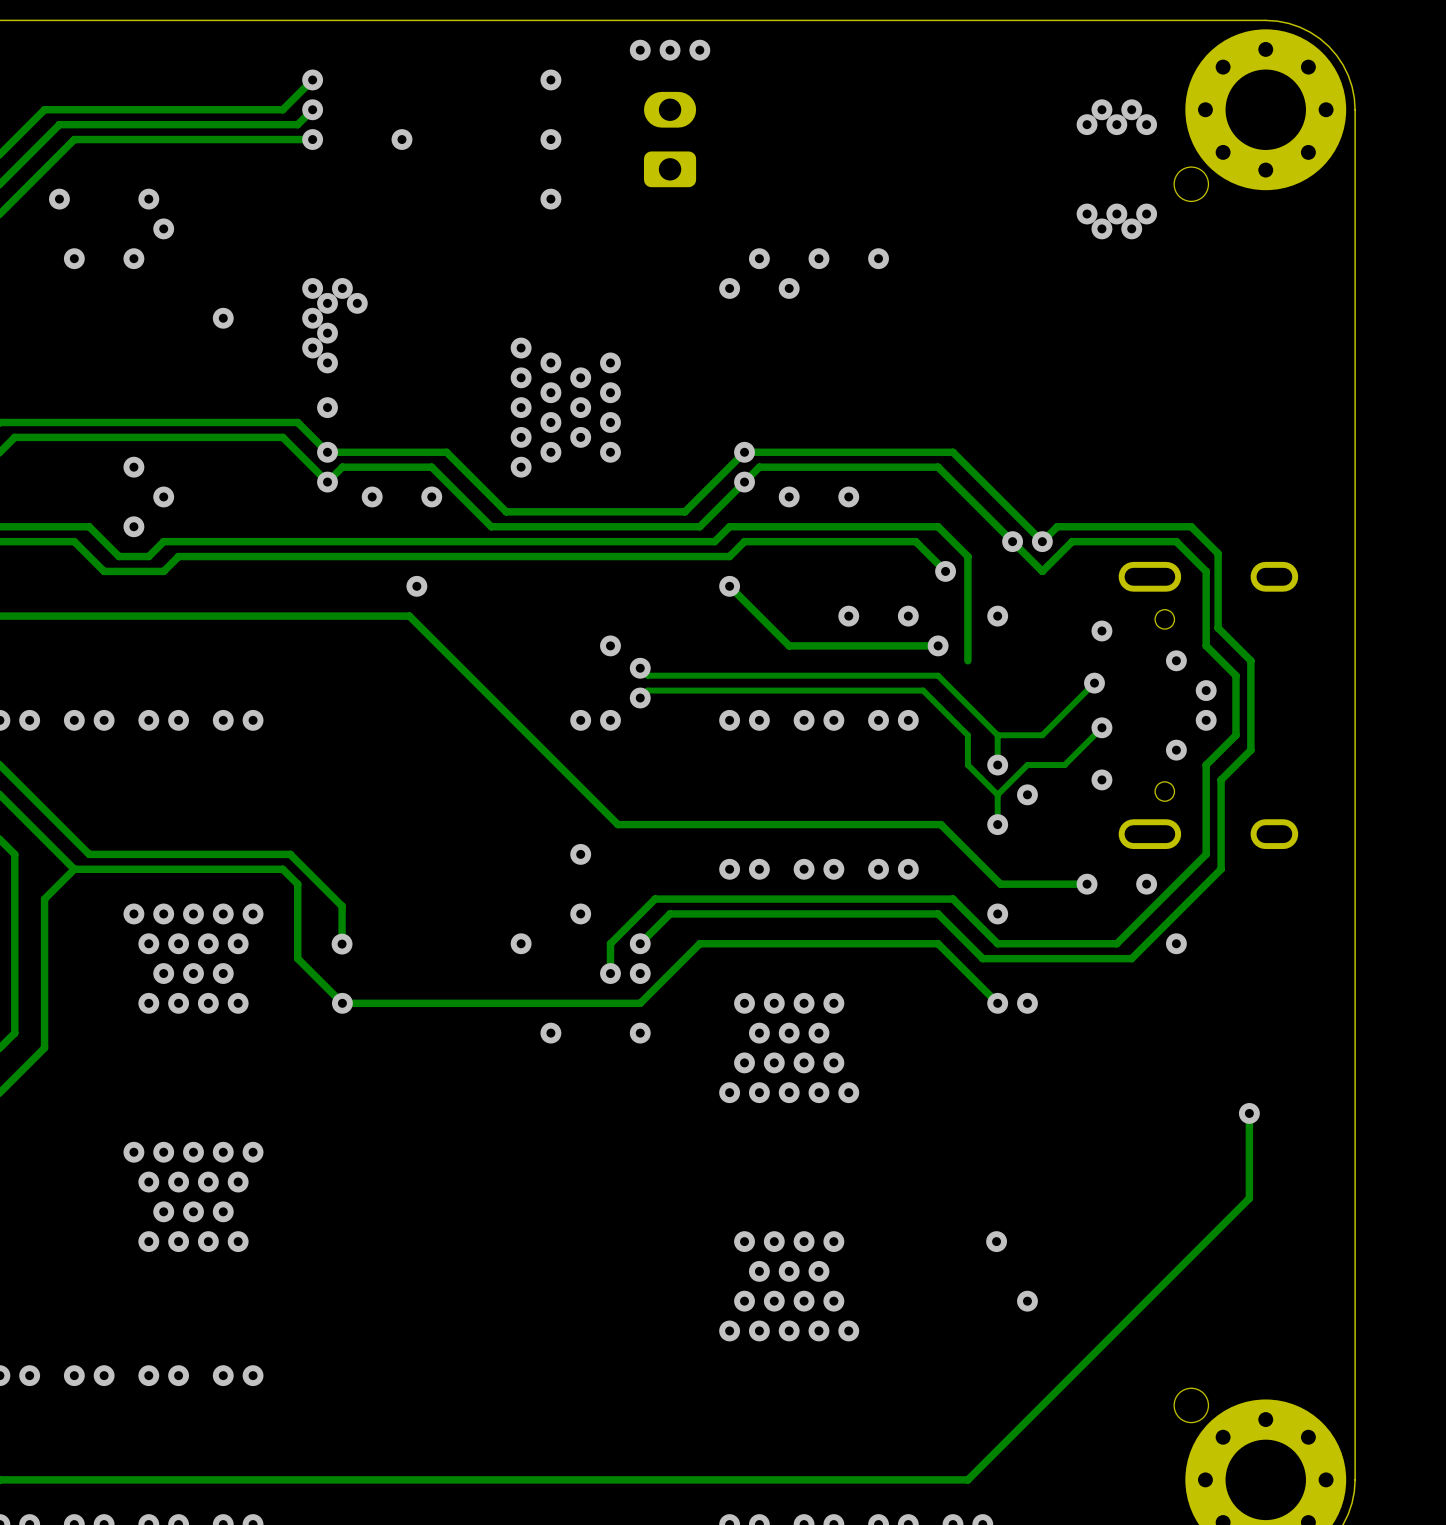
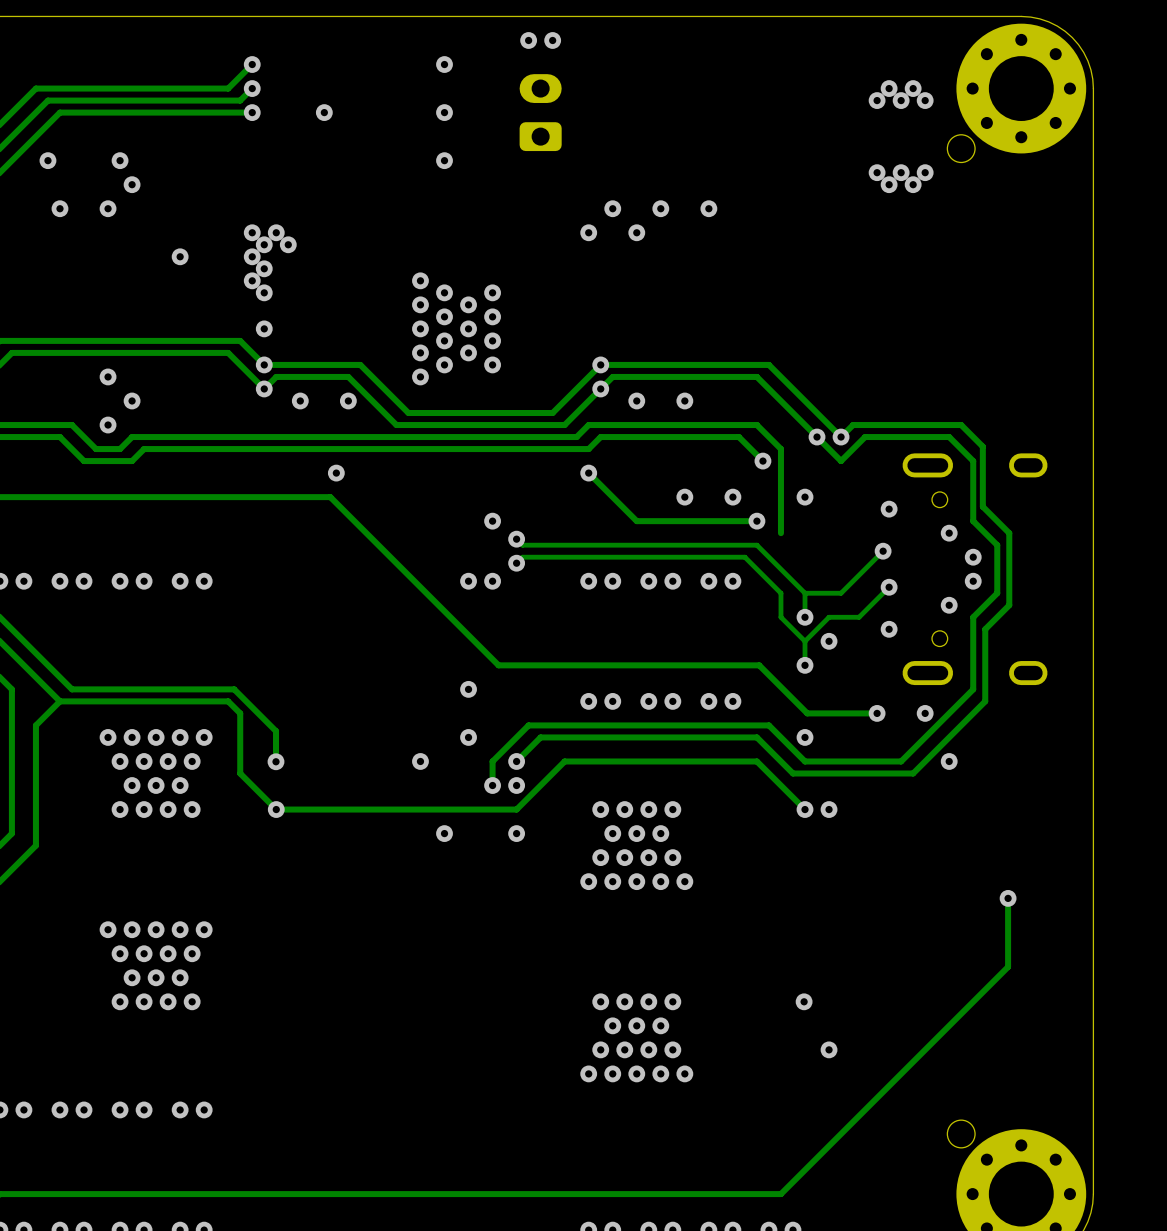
via: (640, 50) -> none
via: none -> (528, 40)
via: (670, 50) -> none
via: none -> (552, 40)
via: (699, 50) -> none

